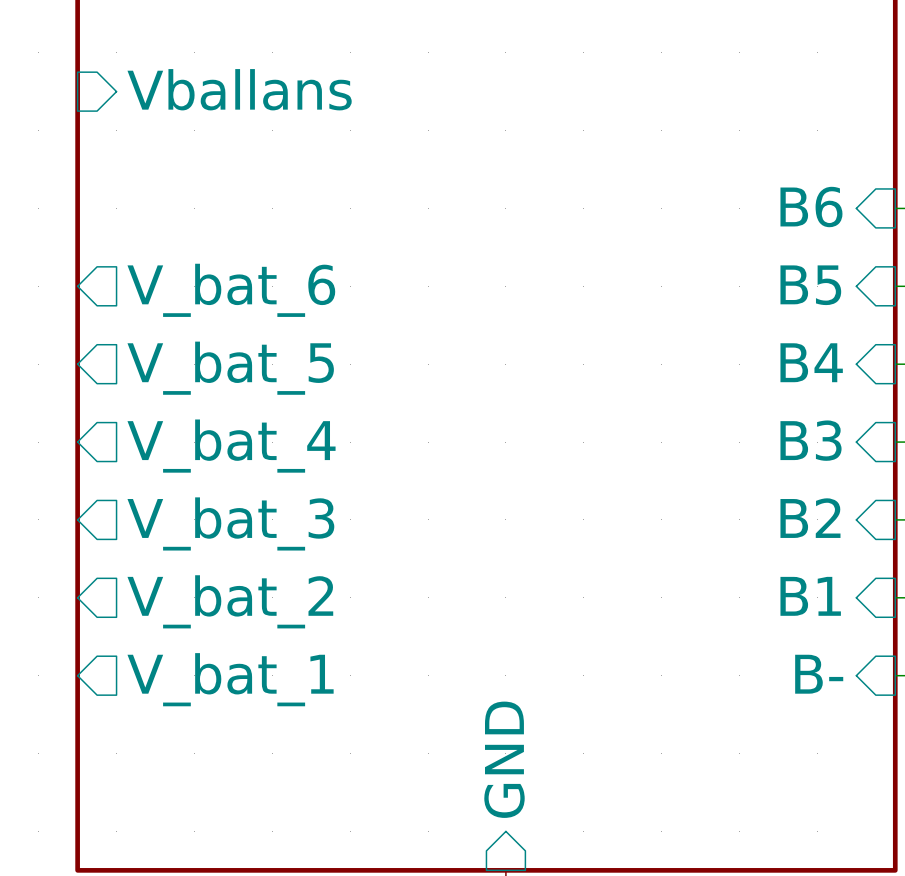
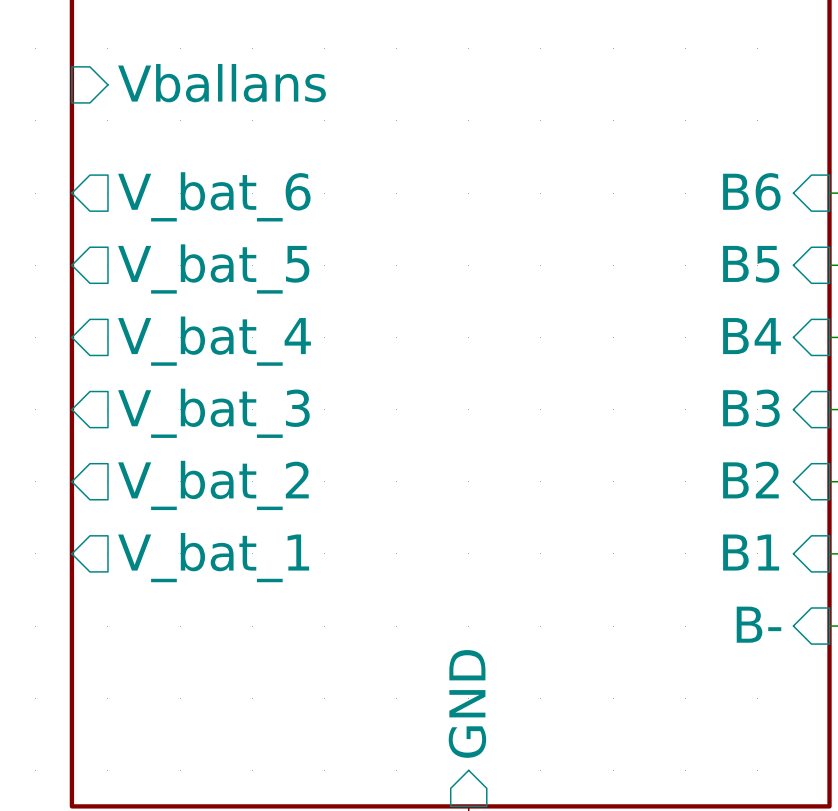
sheet pin: none -> V_bat_6 (214, 196)
sheet pin: V_bat_6 (231, 290) -> V_bat_5 (213, 269)
sheet pin: V_bat_5 (230, 368) -> V_bat_4 (214, 341)
sheet pin: V_bat_4 (231, 446) -> V_bat_3 (213, 413)
sheet pin: V_bat_3 (230, 523) -> V_bat_2 (213, 485)
sheet pin: V_bat_2 (230, 601) -> V_bat_1 (213, 557)
sheet pin: V_bat_1 (230, 679) -> none

